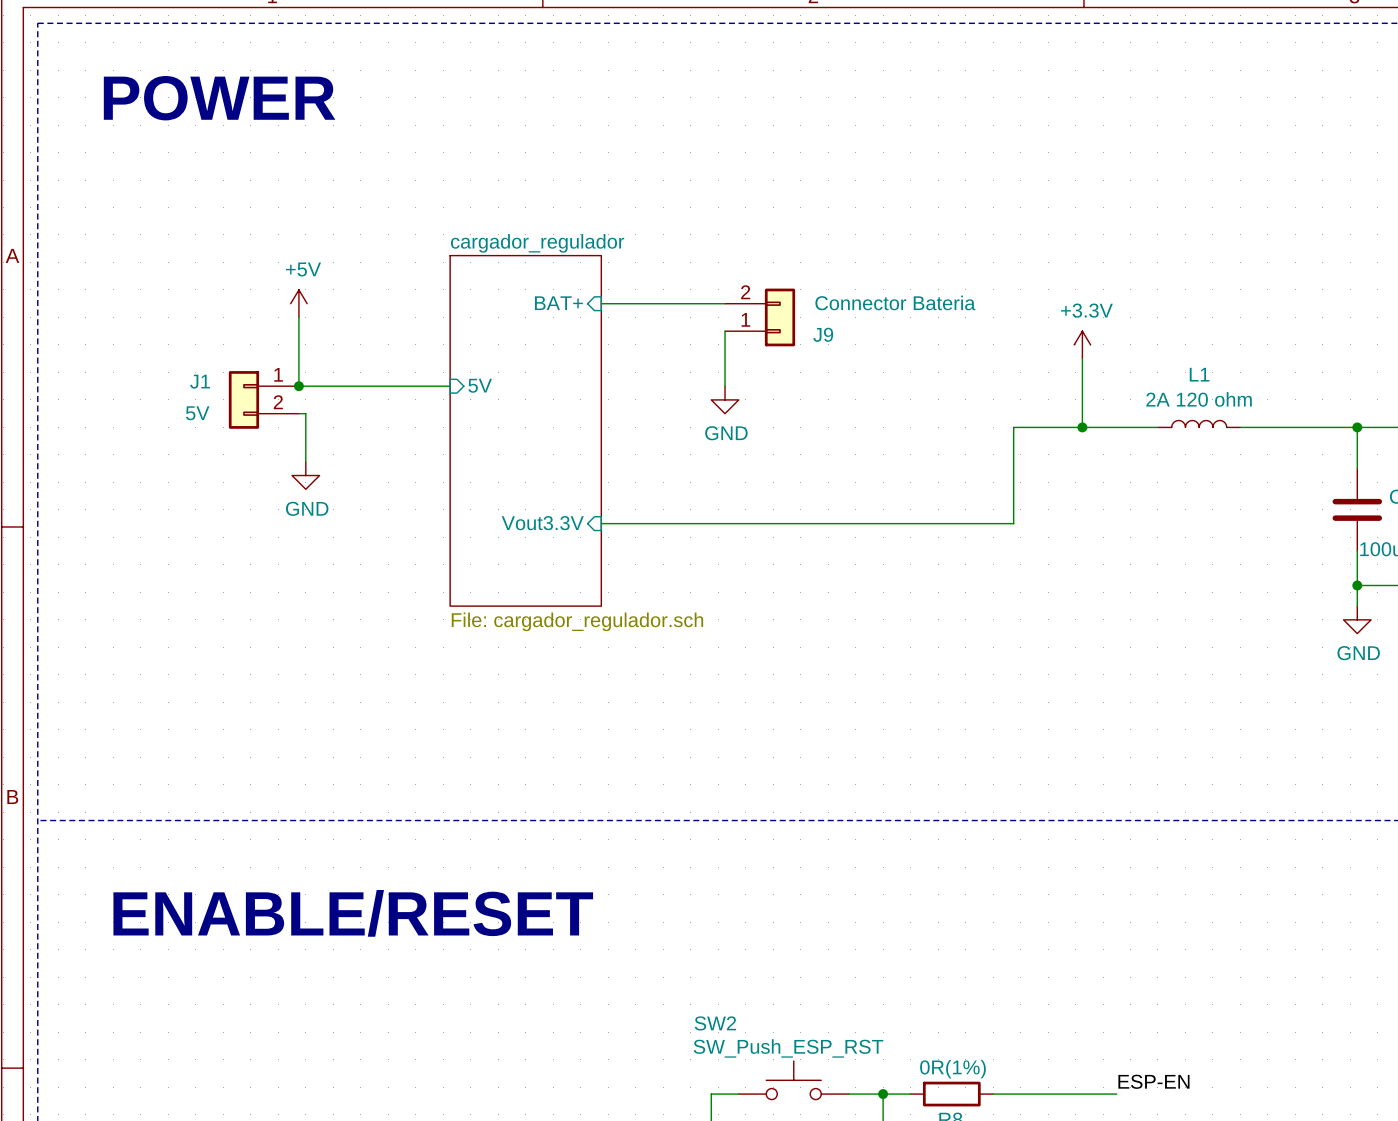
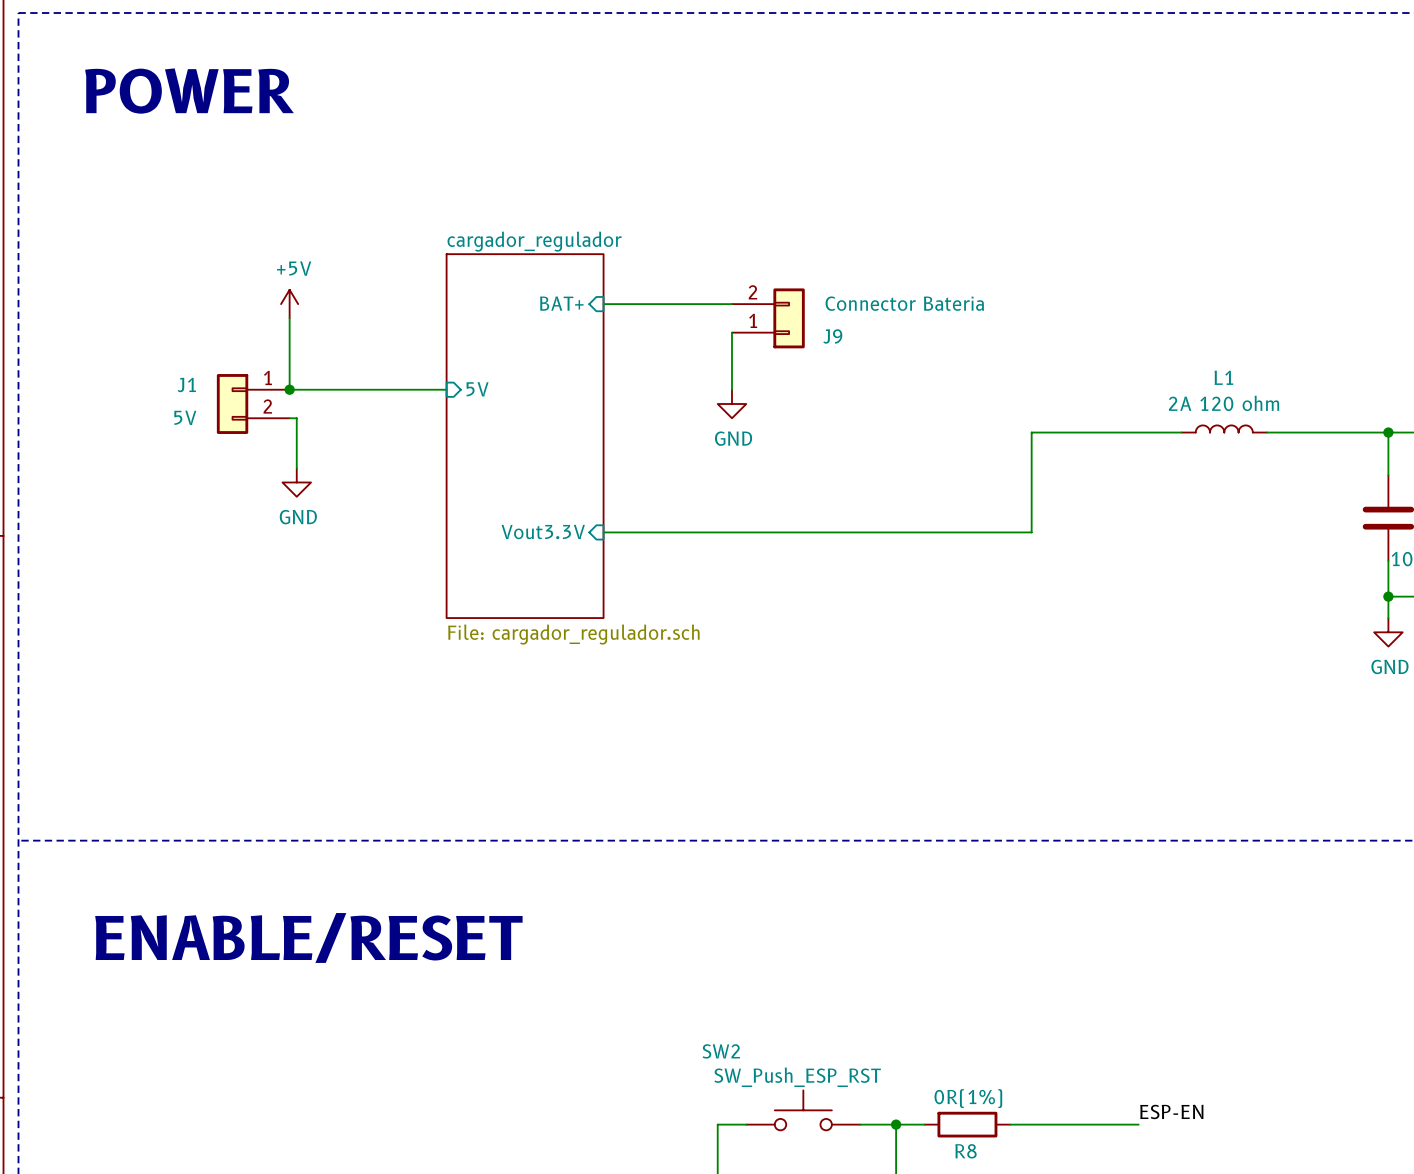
power symbol: +3.3V (1082, 344) -> none
wire: (1082, 358) (1082, 427) -> none
junction: (1082, 427) -> none

